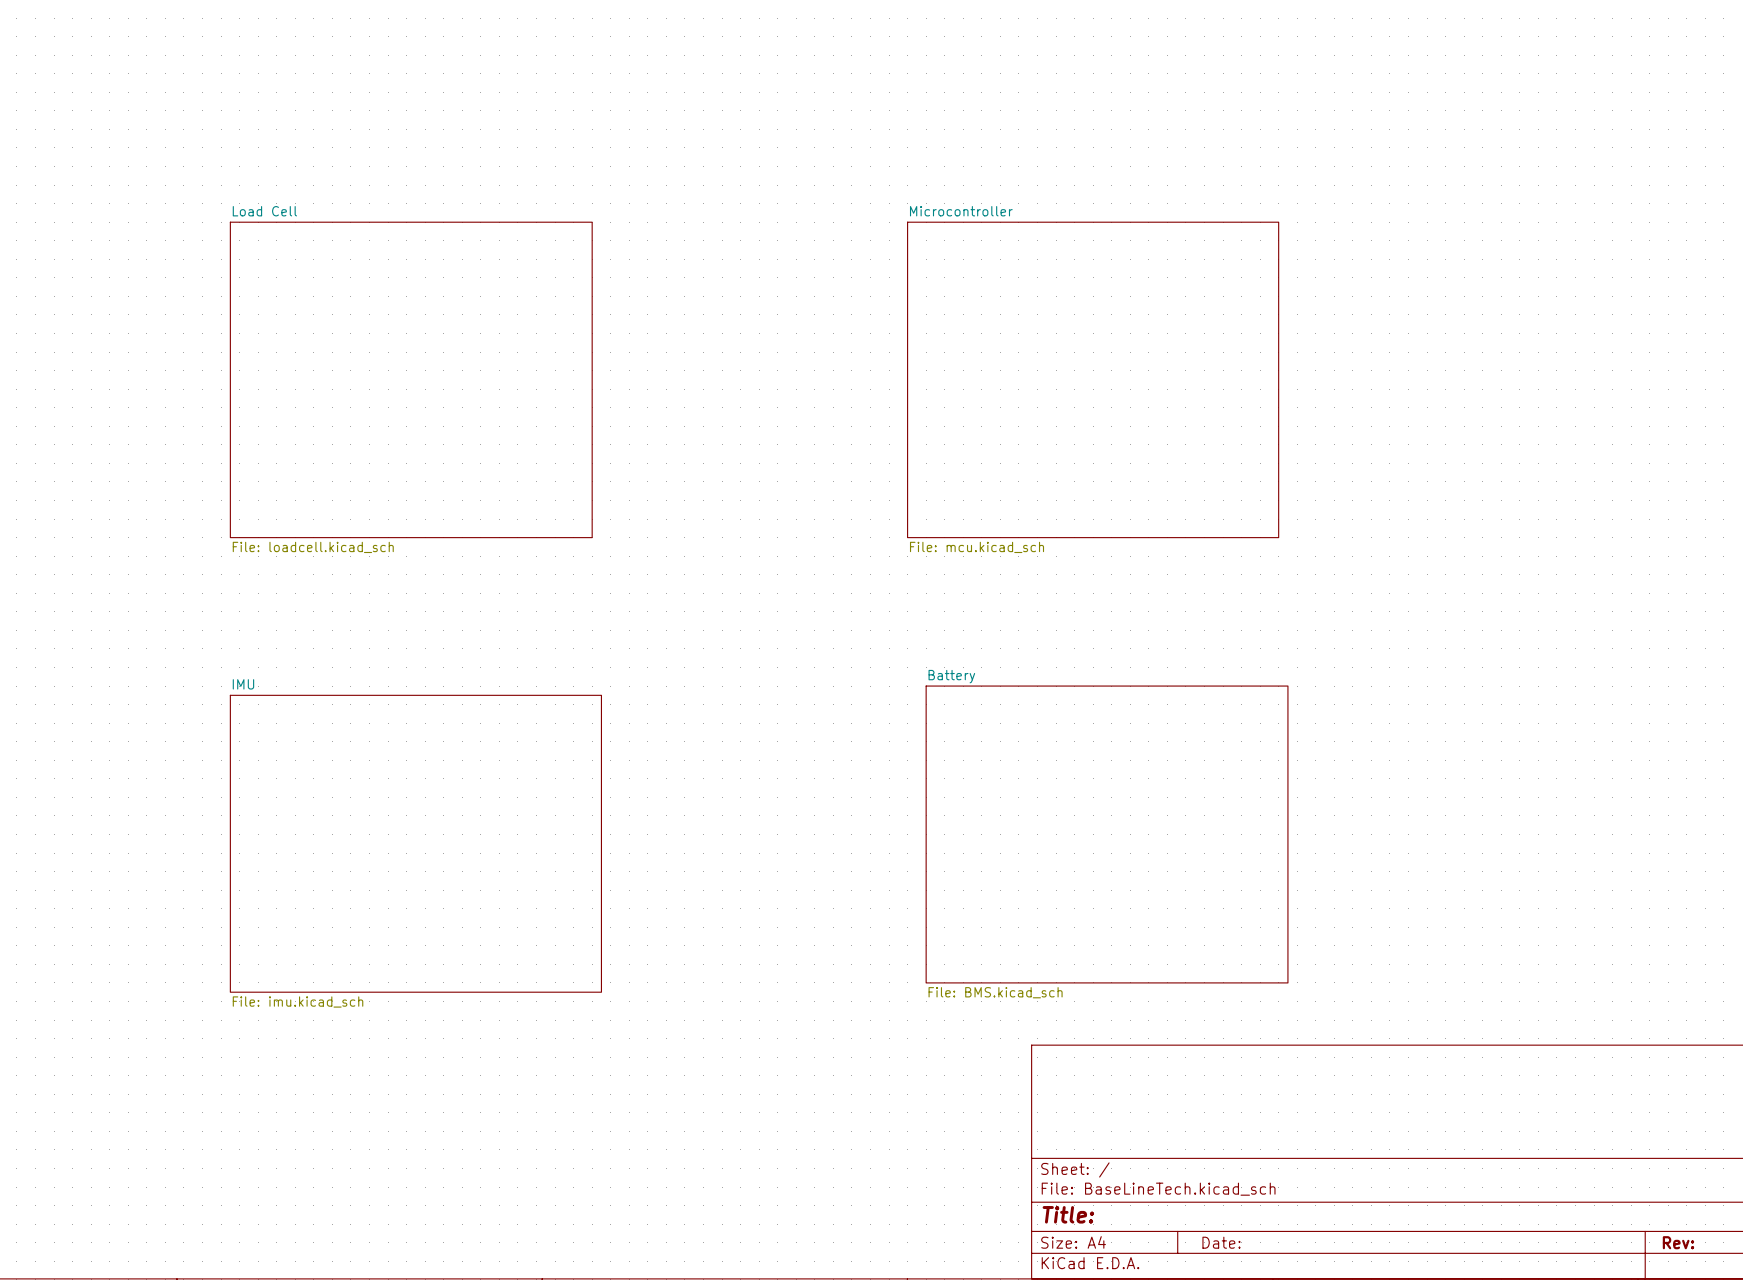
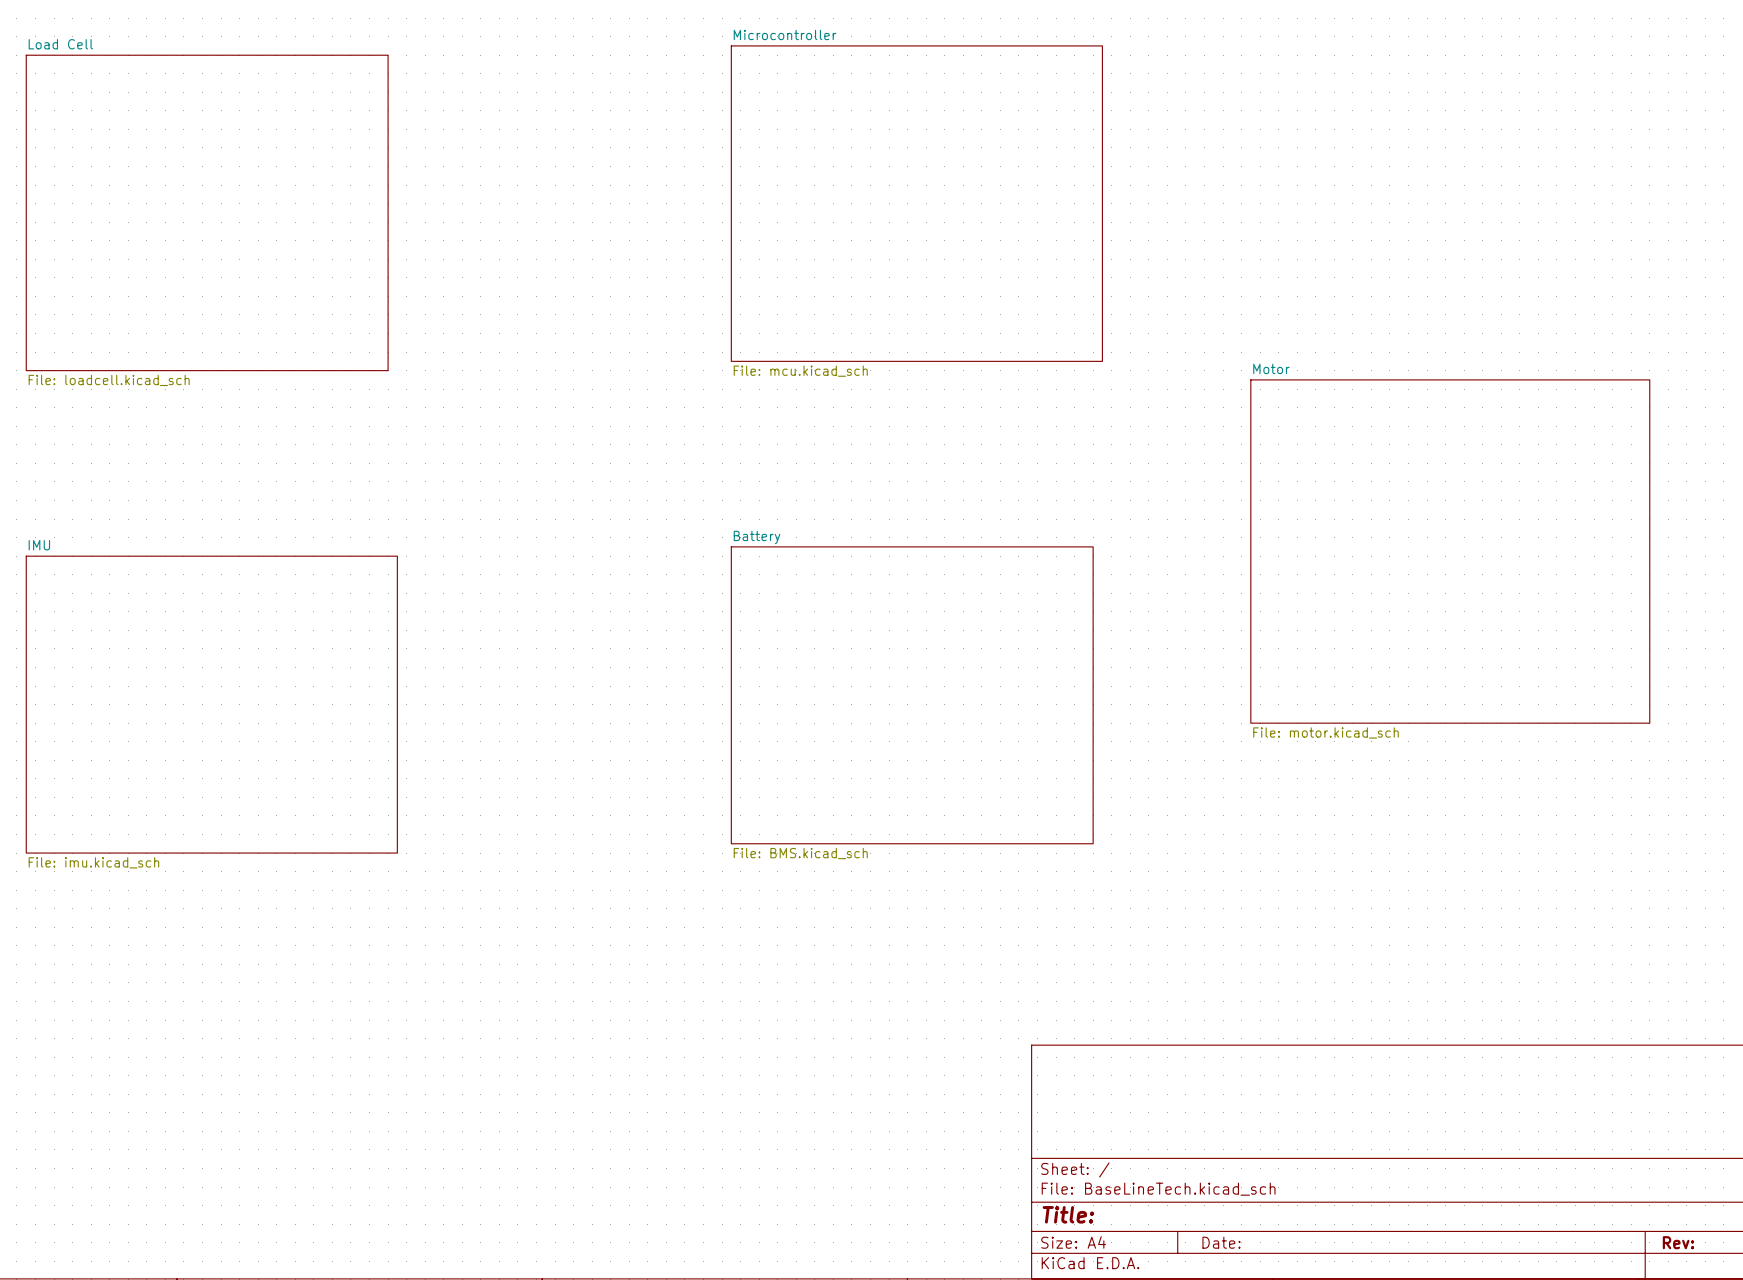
sheet Microcontroller: none -> File: mcu.kicad_sch (916, 203)
sheet Load Cell: none -> File: loadcell.kicad_sch (207, 212)
sheet Load Cell: File: loadcell.kicad_sch (411, 379) -> none
sheet Microcontroller: File: mcu.kicad_sch (1093, 379) -> none
sheet Motor: none -> File: motor.kicad_sch (1450, 551)
sheet Battery: none -> File: BMS.kicad_sch (912, 695)
sheet IMU: none -> File: imu.kicad_sch (211, 704)
sheet Battery: File: BMS.kicad_sch (1107, 834) -> none
sheet IMU: File: imu.kicad_sch (415, 843) -> none

